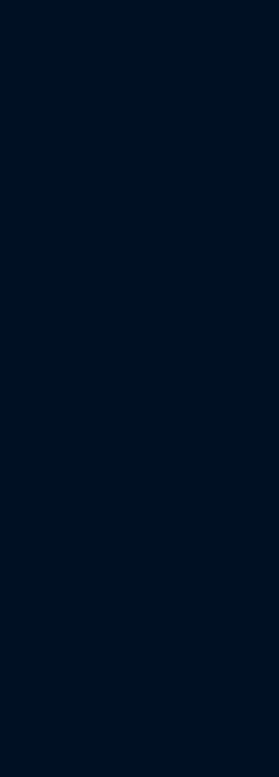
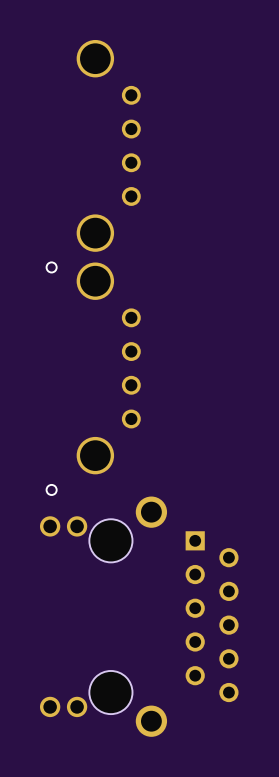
part: none -> (93, 156)
part: none -> (93, 379)
part: none -> (139, 616)

